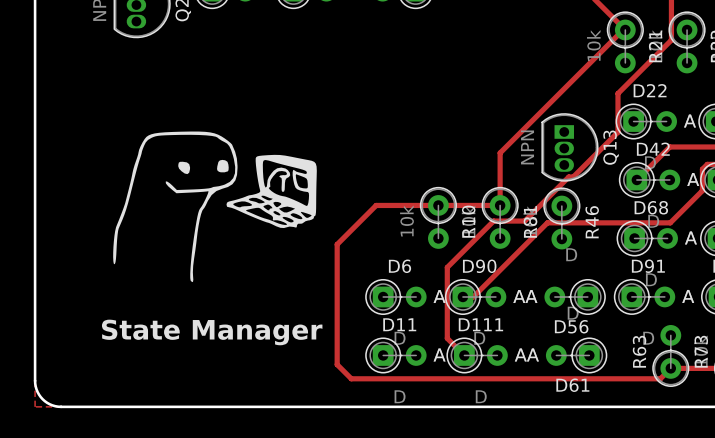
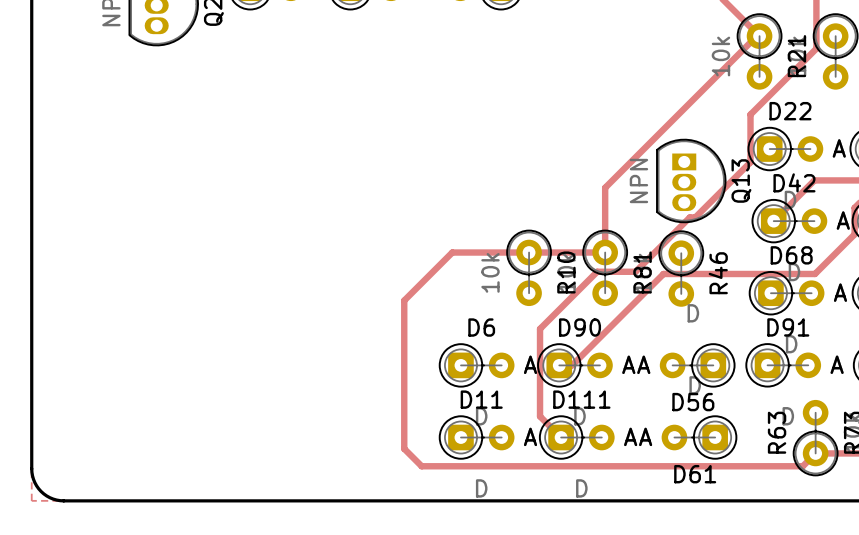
drawing: [113, 131, 317, 283] -> none
text: State Manager (212, 332) -> none

